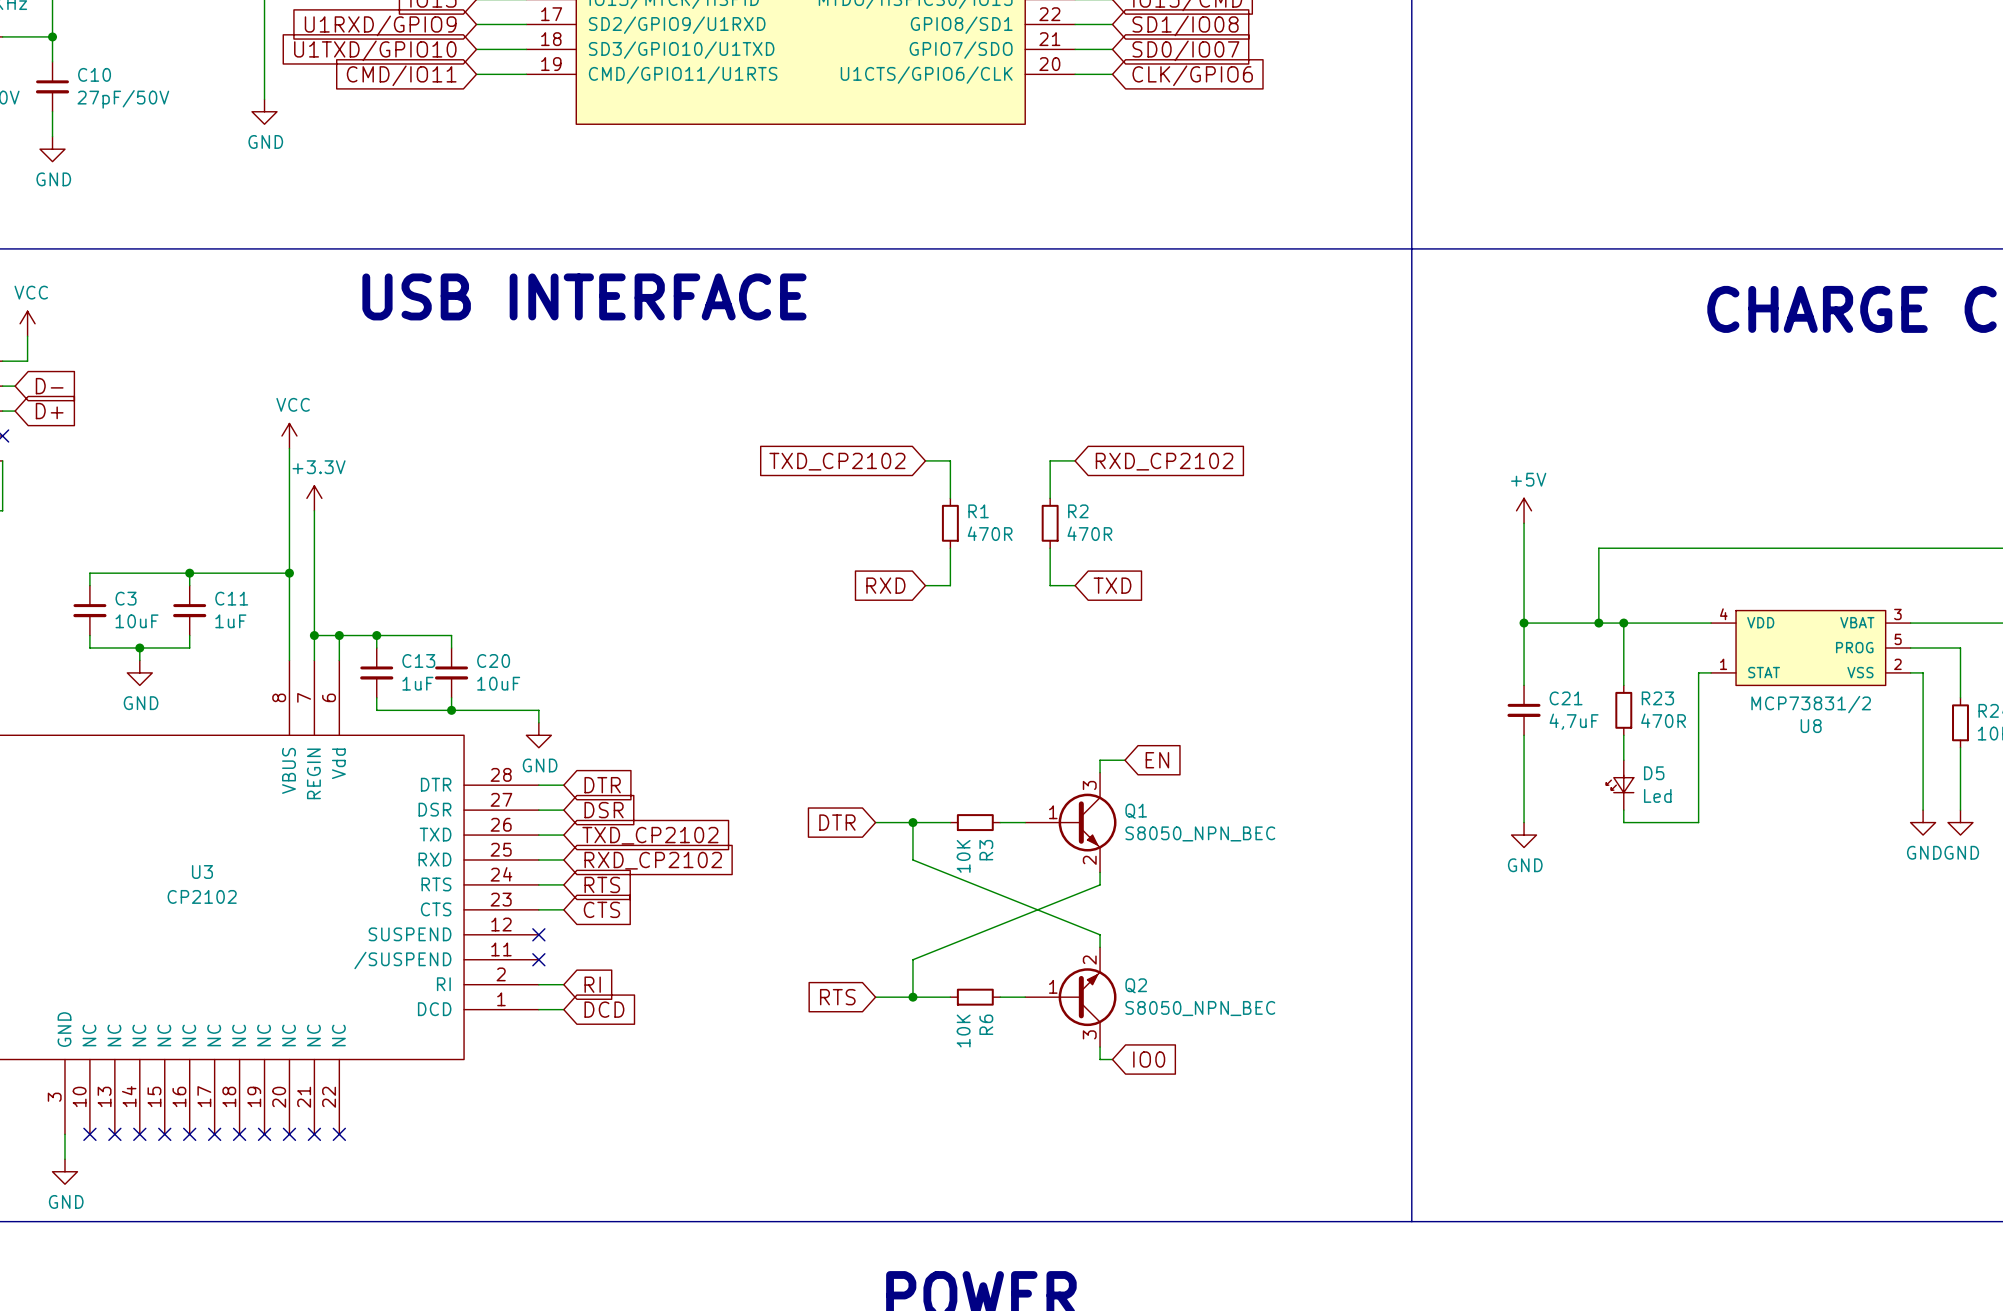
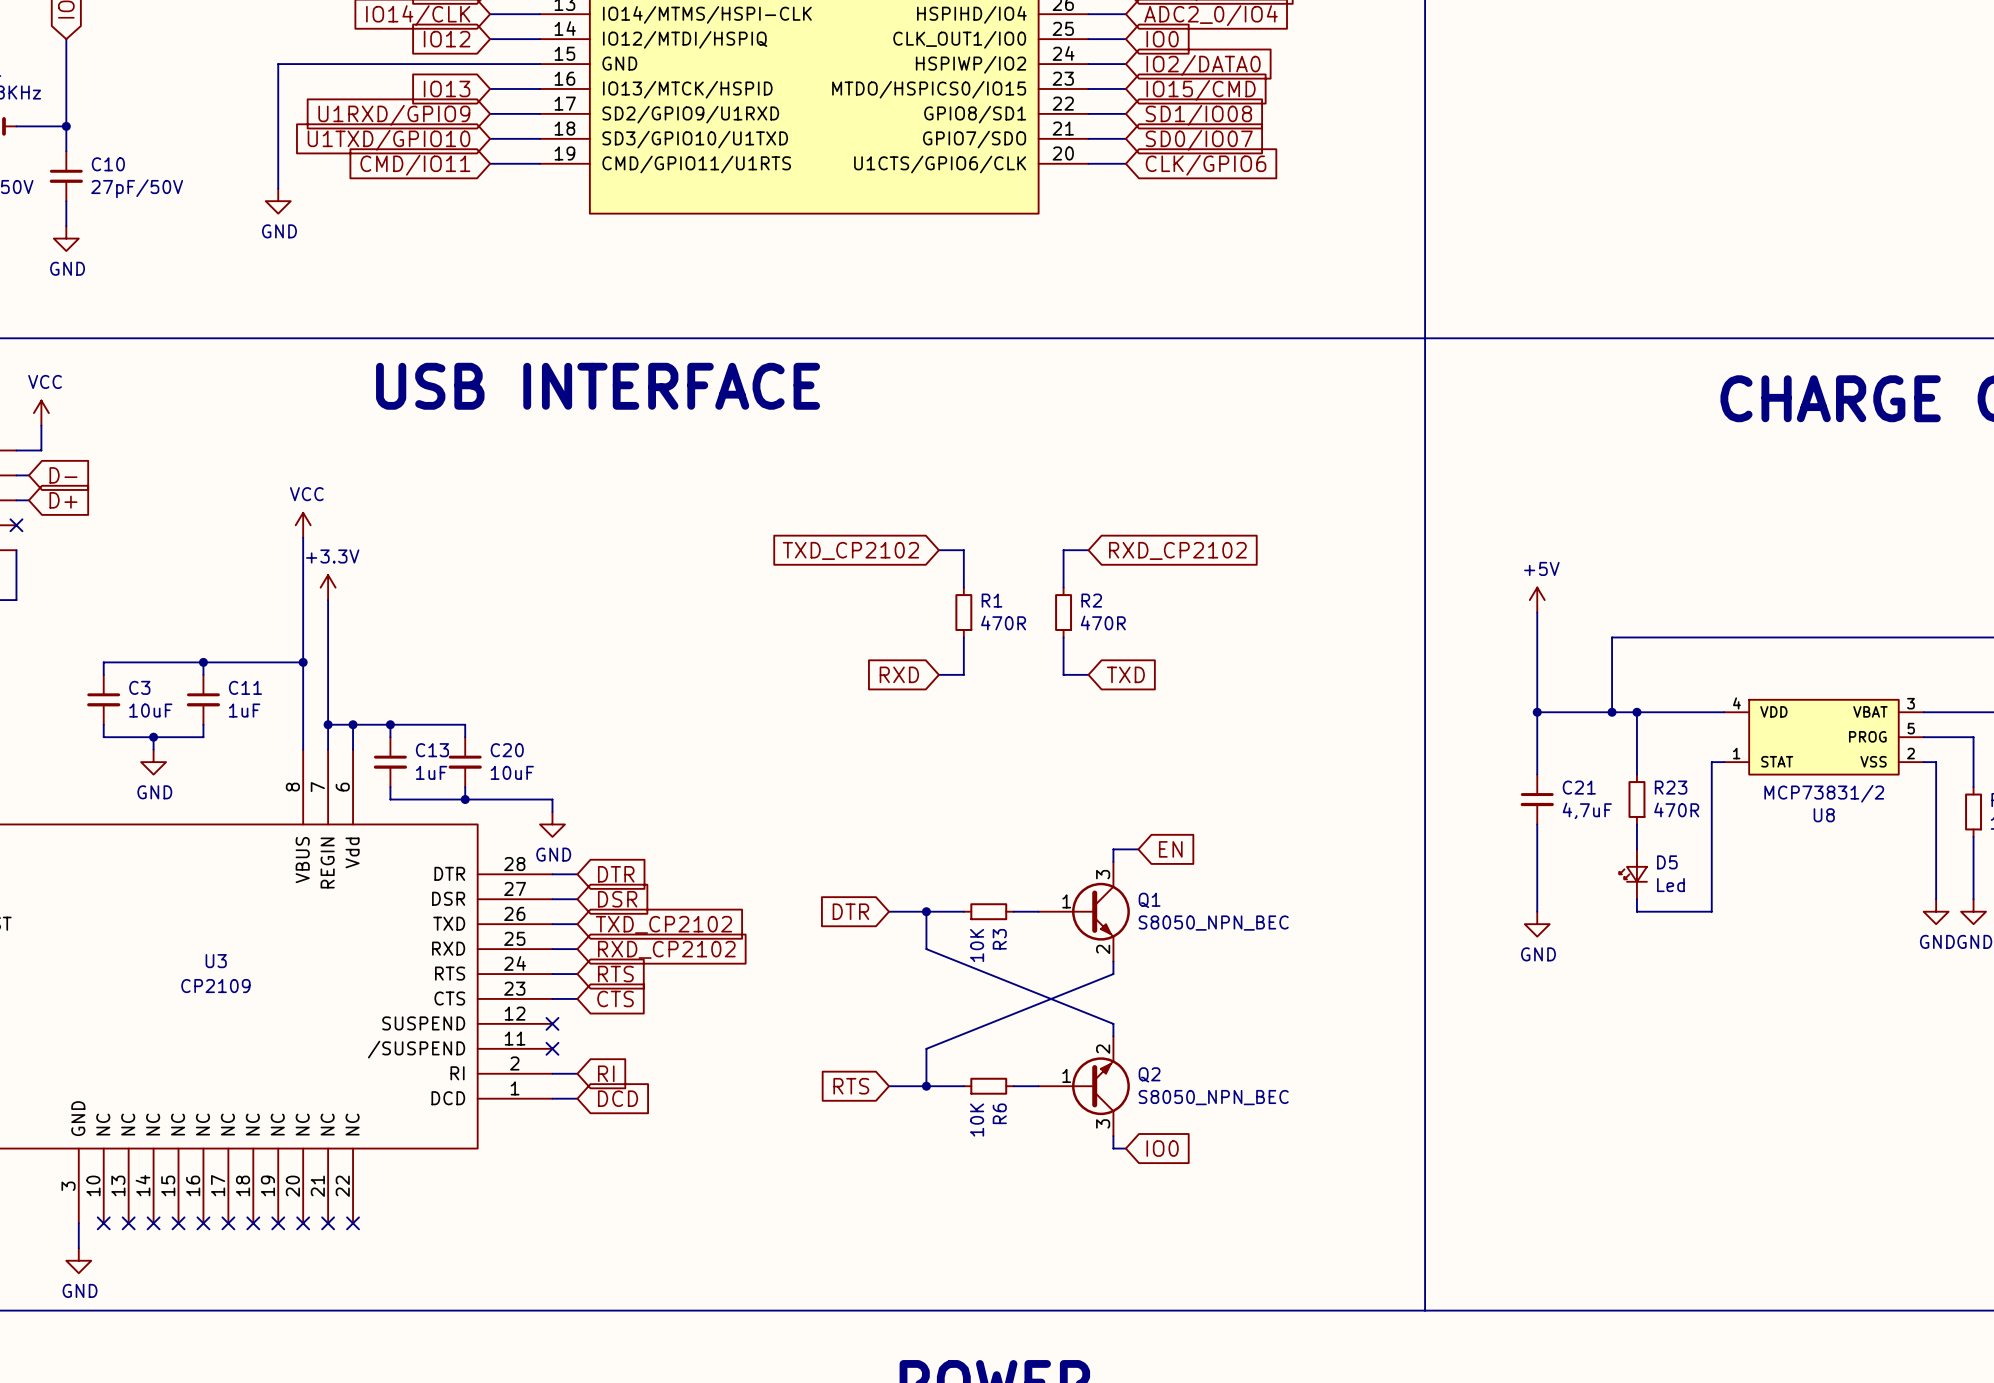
U3 value: CP2102 (202, 896) -> CP2109 (215, 986)

